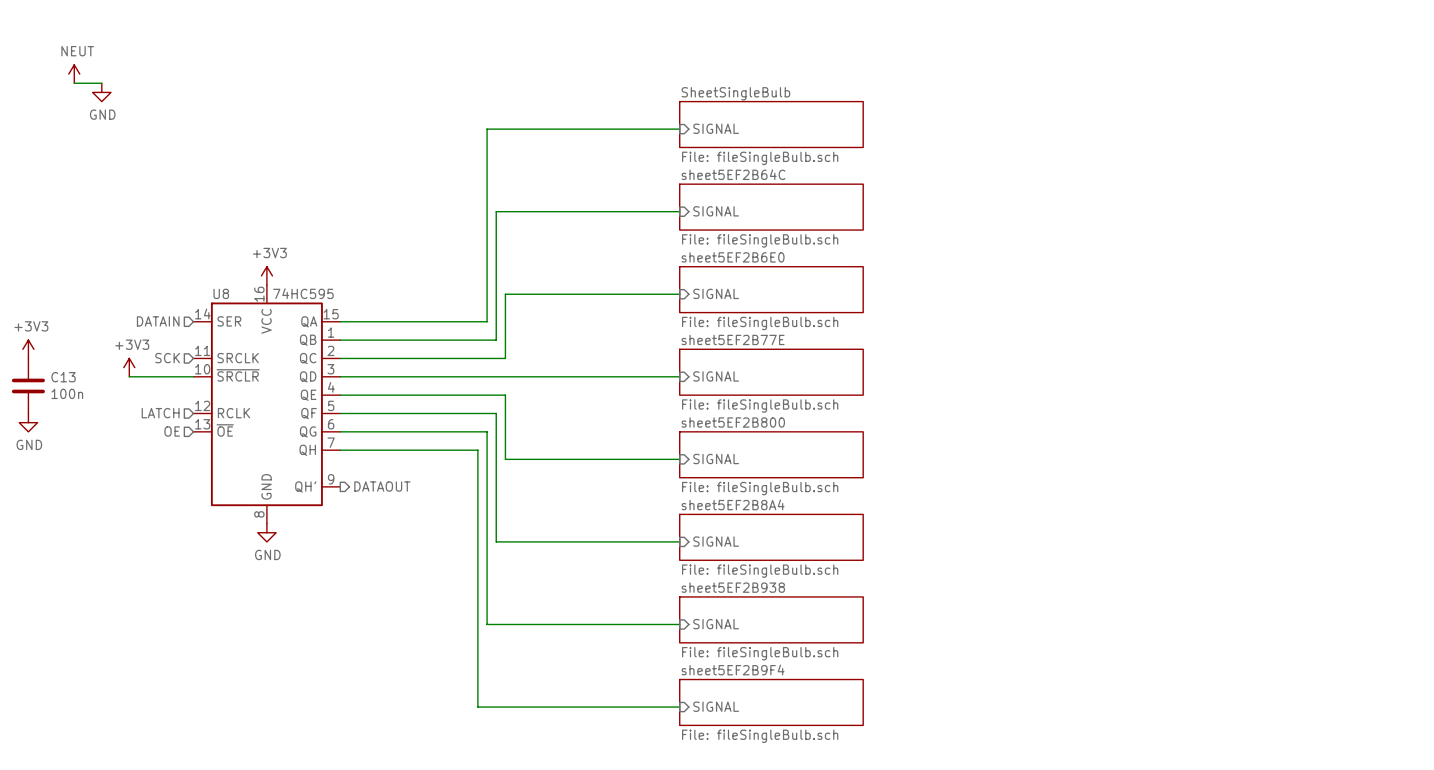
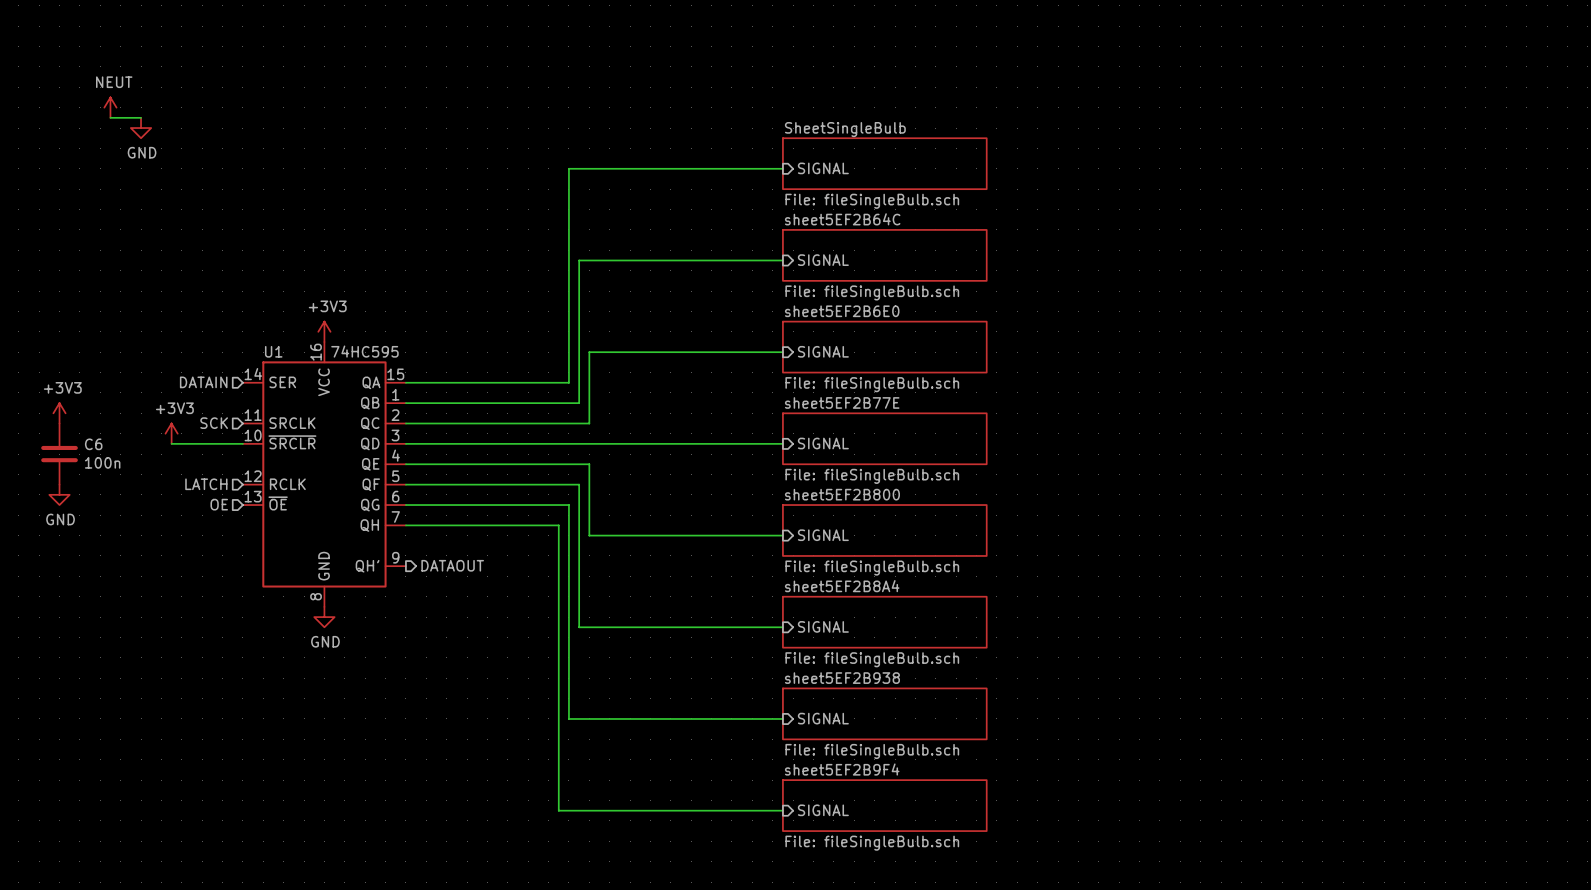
U8 name: U8 (221, 293) -> U1 (273, 351)
C13 name: C13 (63, 377) -> C6 (93, 444)

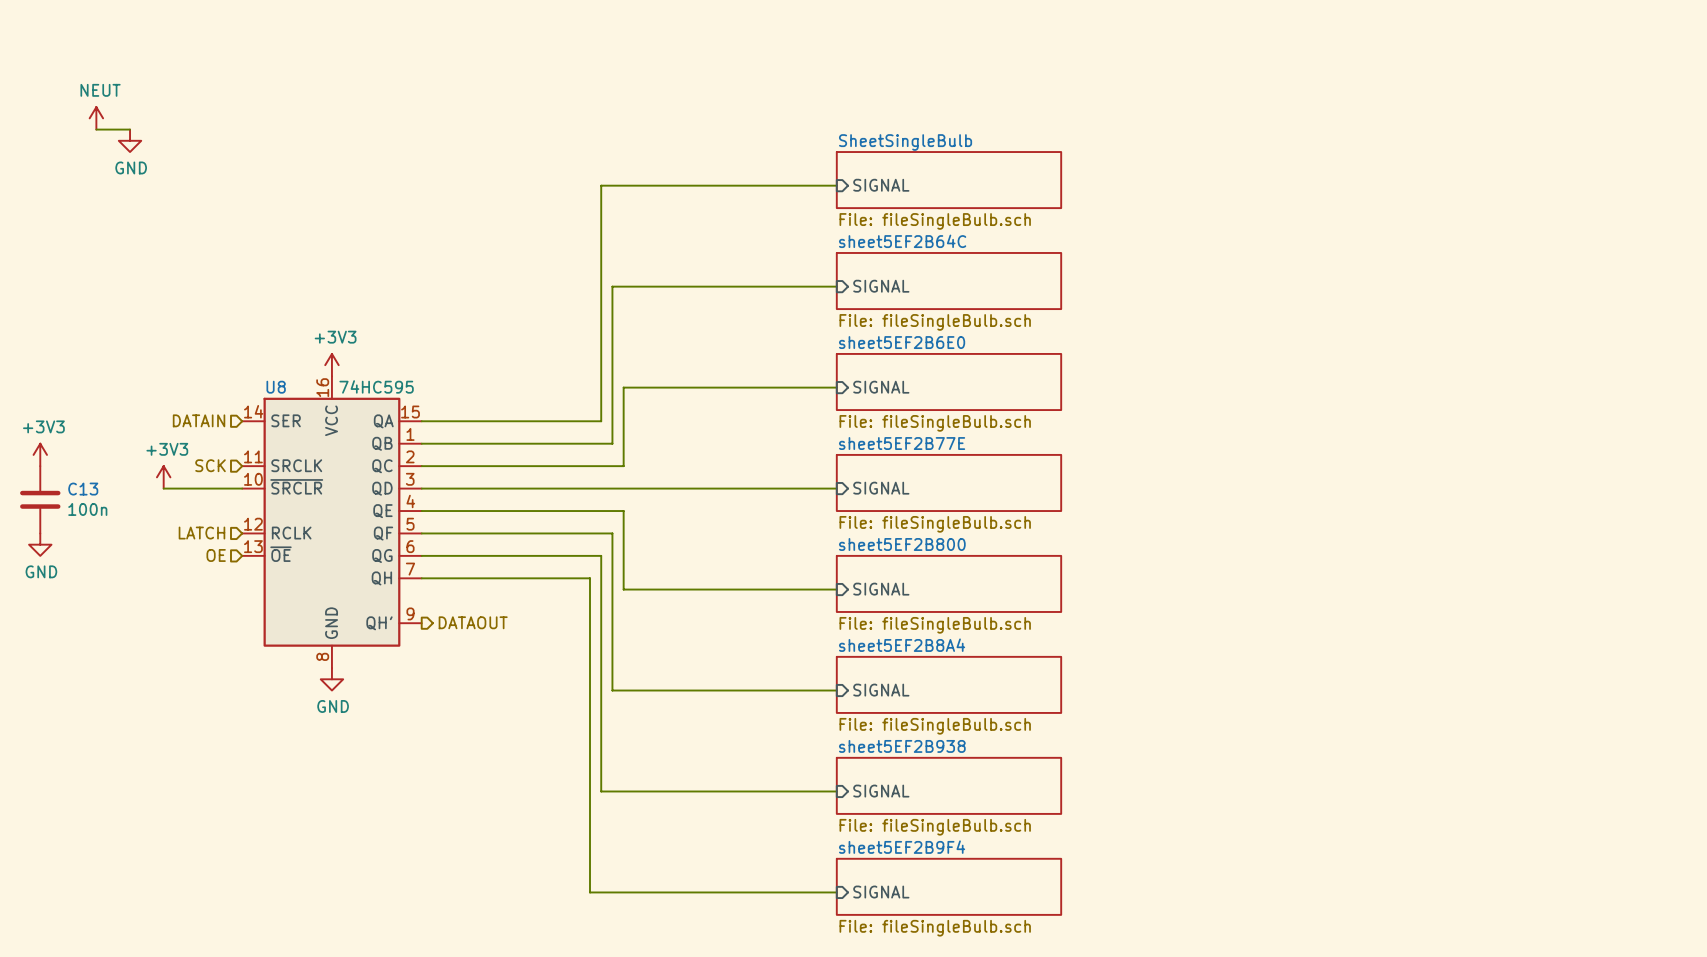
U1 name: U1 (273, 351) -> U8 (276, 387)
C6 name: C6 (93, 444) -> C13 (83, 489)

